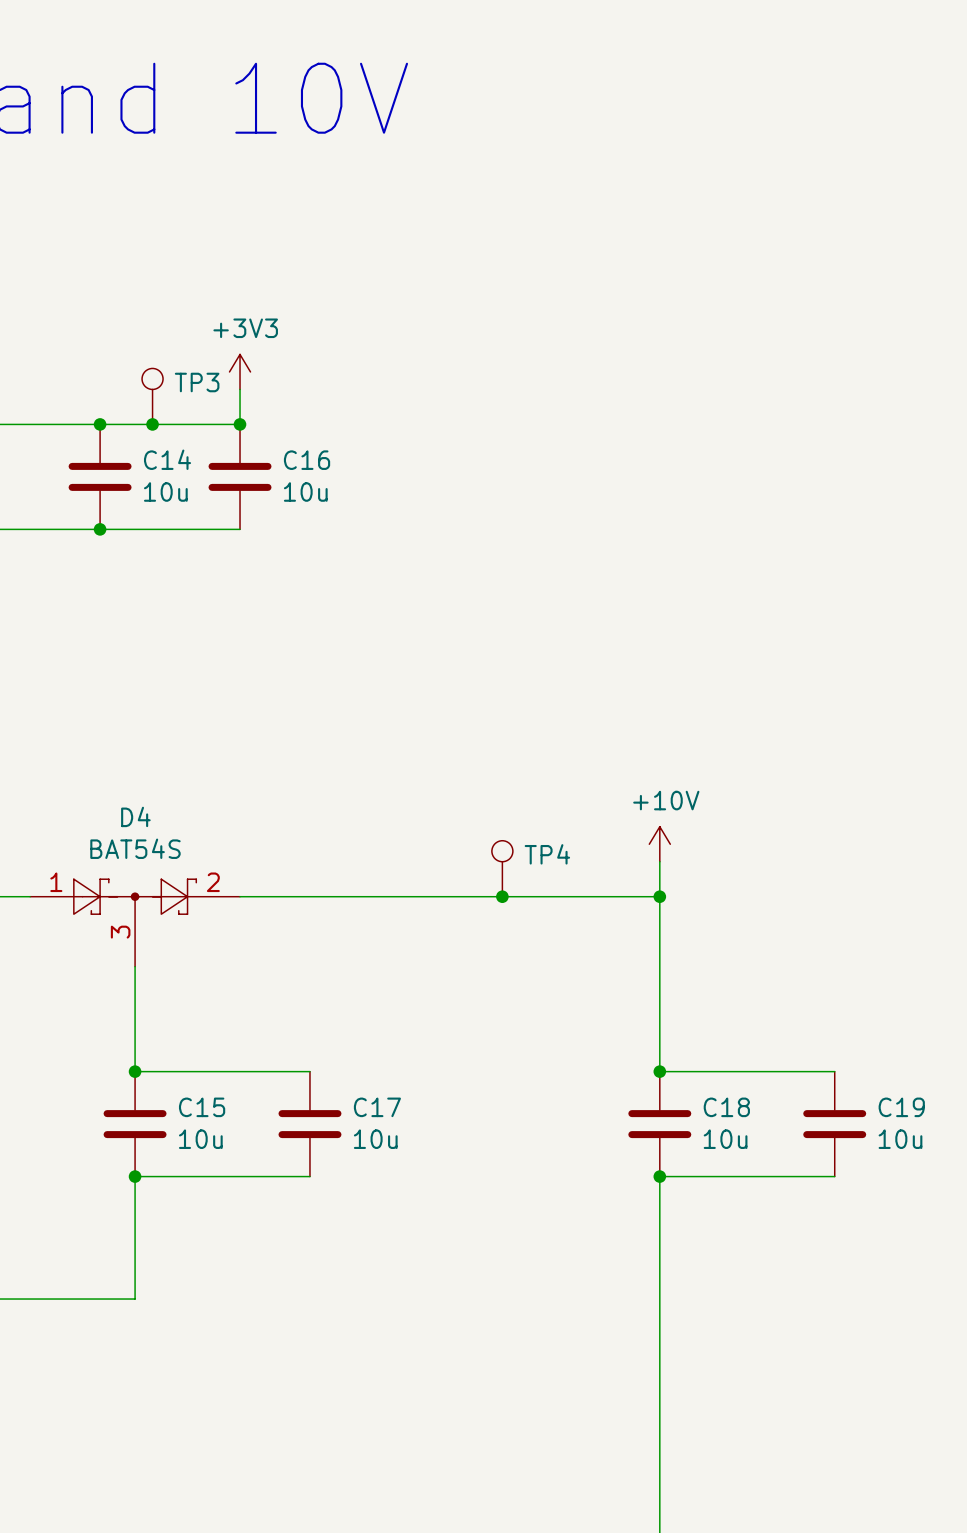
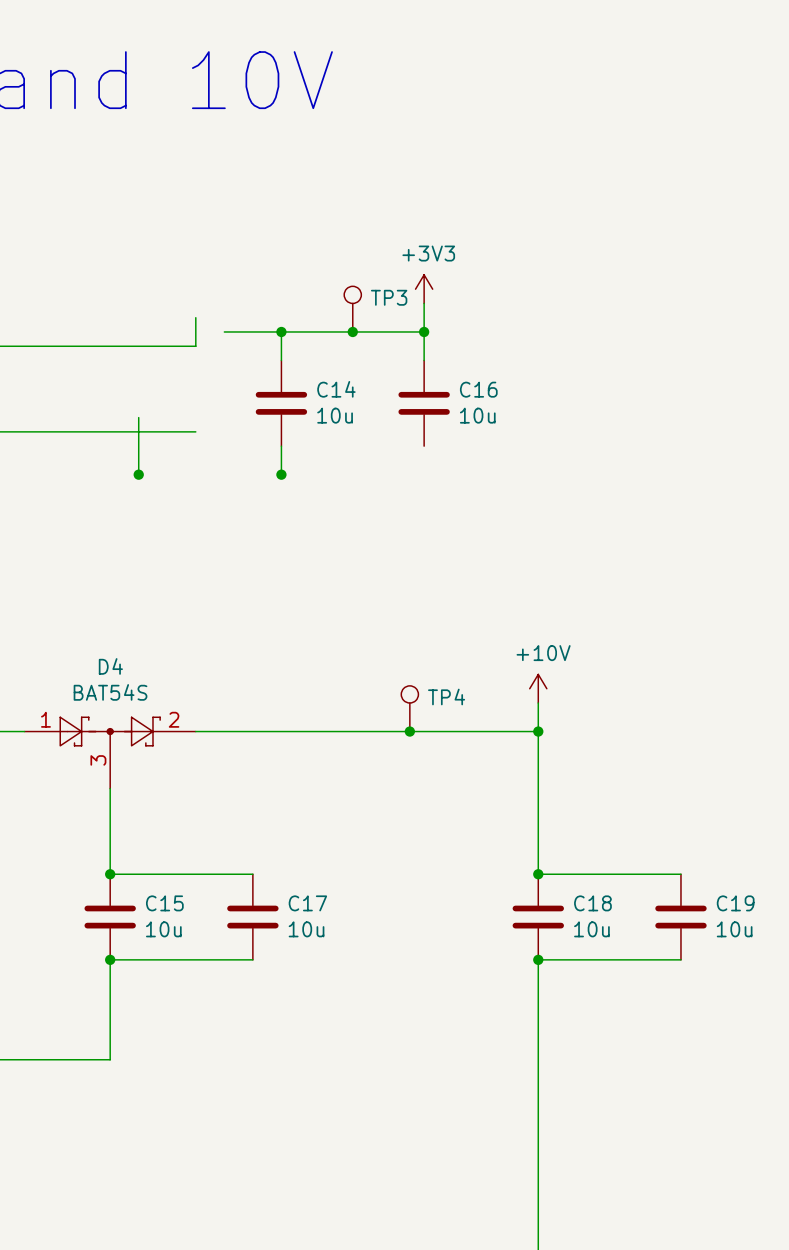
power symbol position: +3V3 (240, 371) -> +3V3 (424, 289)
wire: none -> (424, 303) (424, 360)
TP3 position: (152, 396) -> (352, 309)
wire: none -> (224, 331) (424, 331)
wire: none -> (281, 331) (281, 360)
junction: none -> (281, 331)
junction: none -> (352, 331)
junction: none -> (424, 331)
junction: (100, 424) -> none
junction: (152, 424) -> none
junction: (240, 424) -> none
C14 position: (100, 476) -> (281, 403)
C16 position: (240, 476) -> (424, 403)
wire: none -> (138, 417) (138, 474)
junction: (100, 529) -> none
wire: none -> (281, 446) (281, 474)
junction: none -> (138, 474)
junction: none -> (281, 474)

